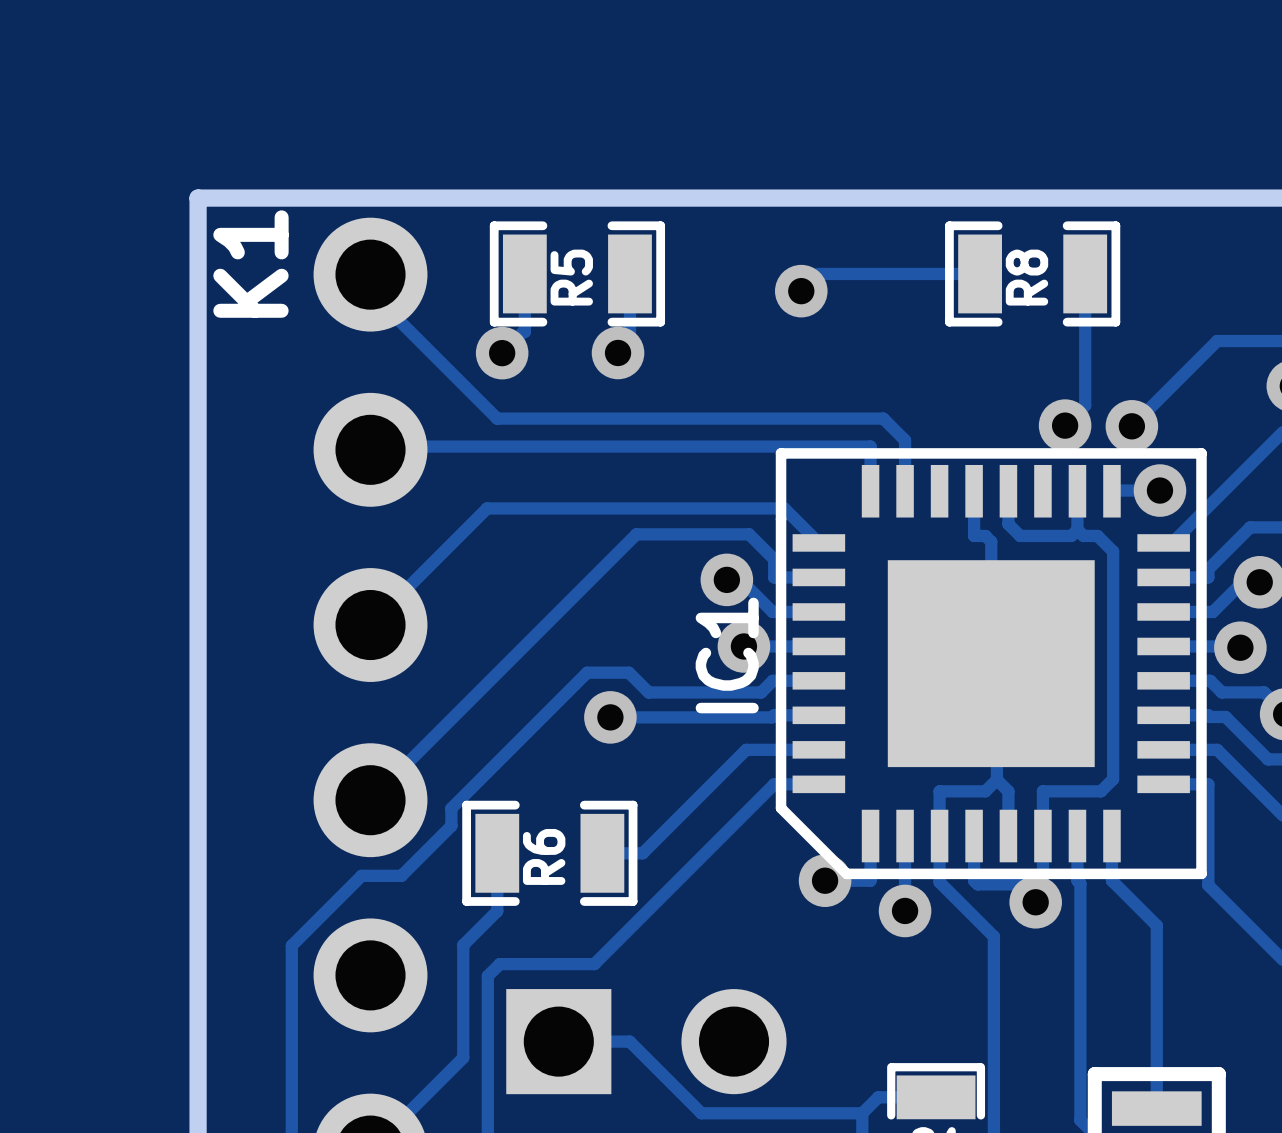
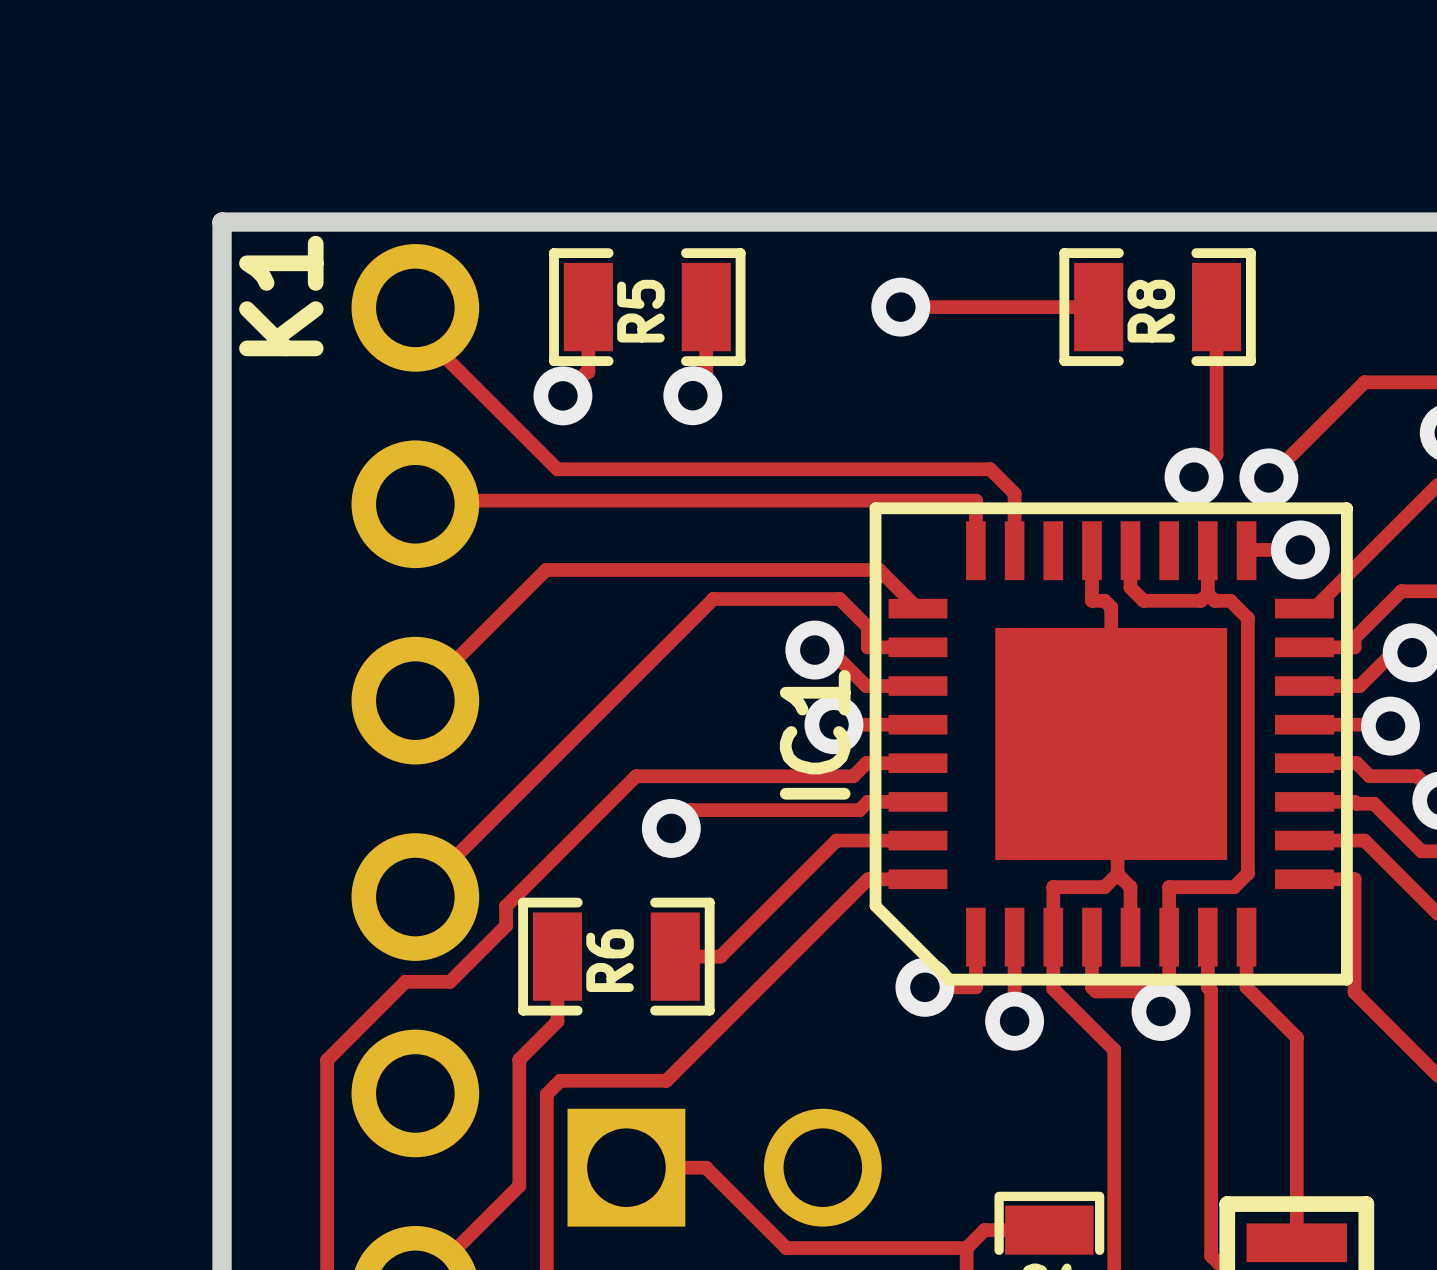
via position: (801, 291) -> (900, 307)
track: (567, 692) (587, 672) (628, 672) (648, 692) -> (636, 776) (727, 776)
track: (610, 717) (772, 717) -> (671, 828) (689, 810) (859, 810) (865, 804)
via position: (610, 717) -> (671, 828)

